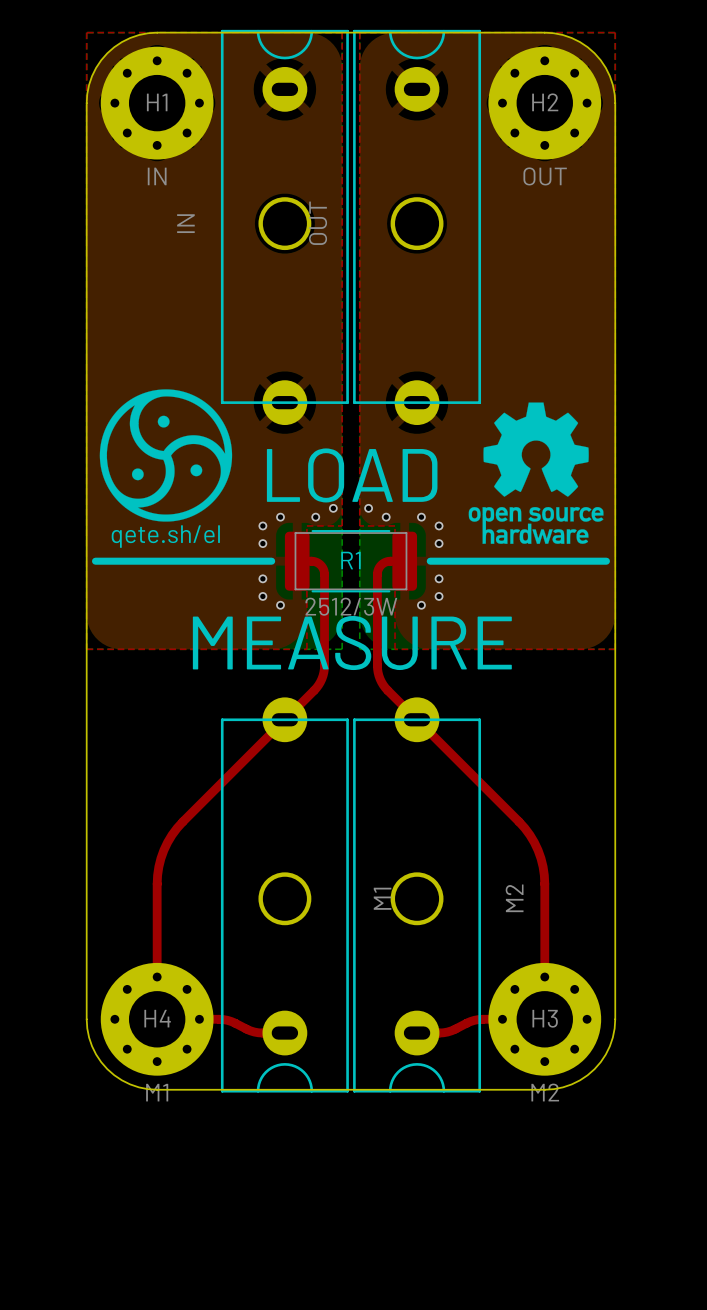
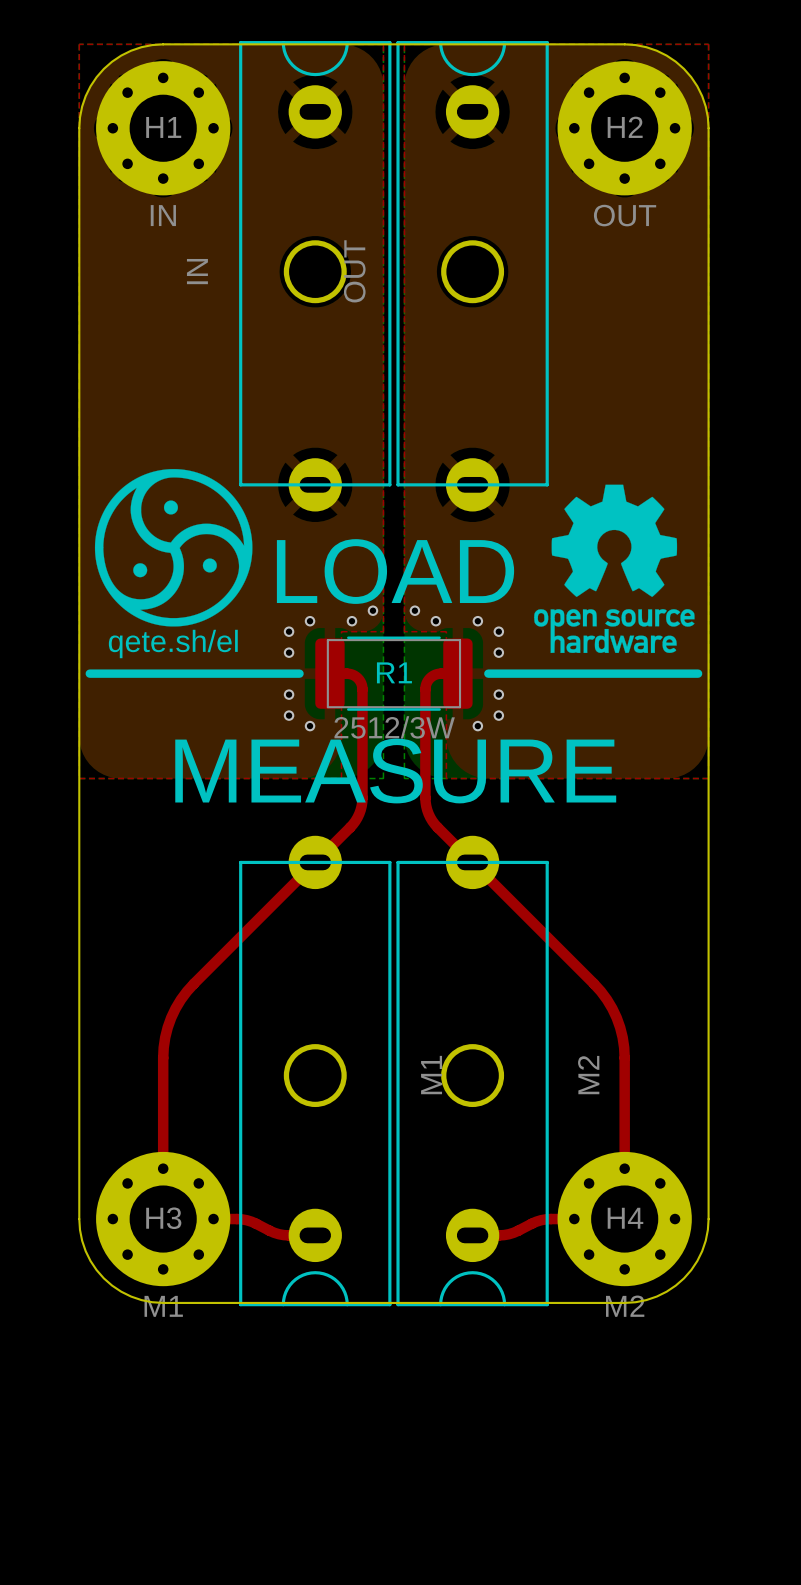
H4 name: H4 (157, 1018) -> H3 (163, 1218)
H3 name: H3 (545, 1018) -> H4 (625, 1218)

